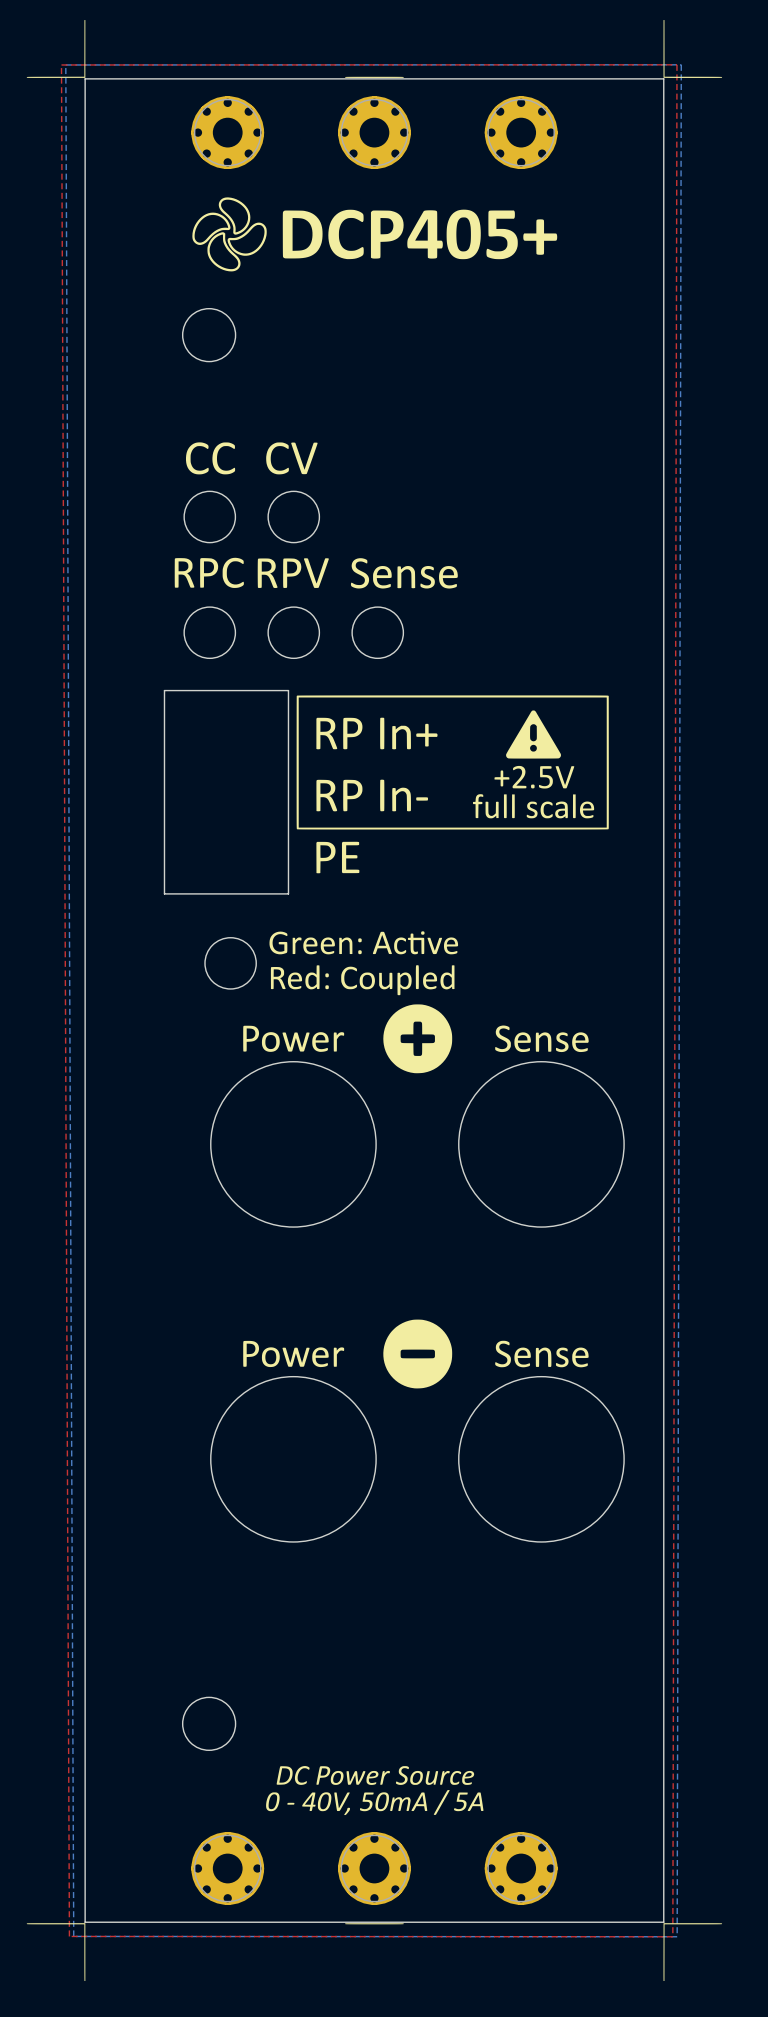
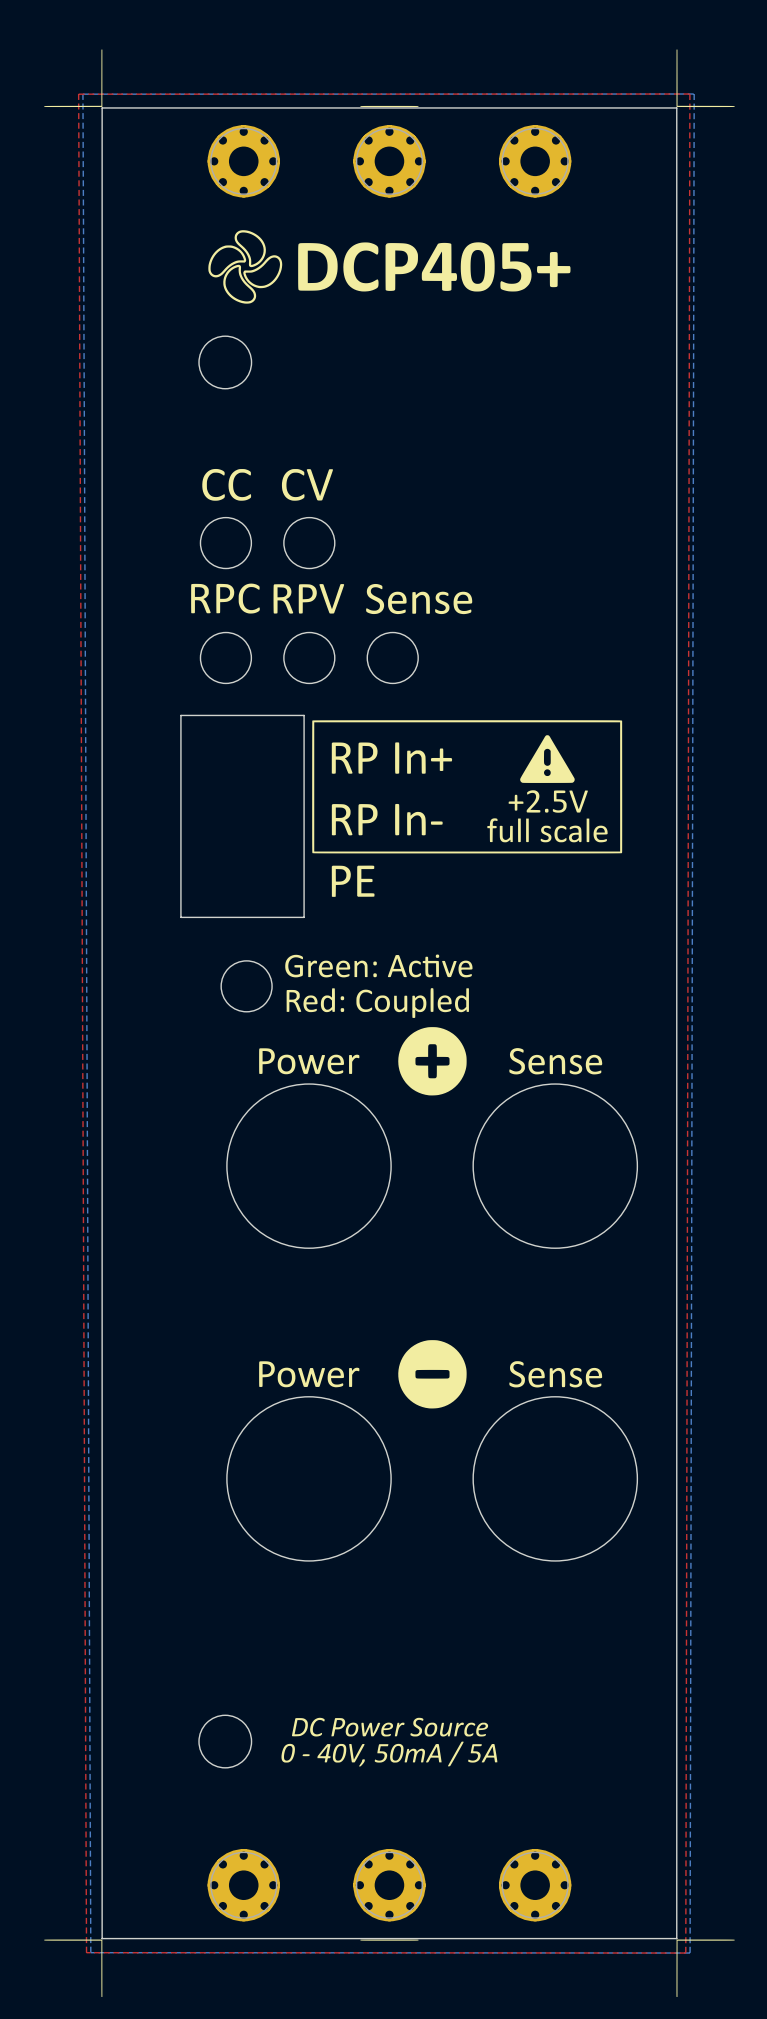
drawing shape: [26, 20, 723, 1982] -> [44, 49, 735, 1997]

